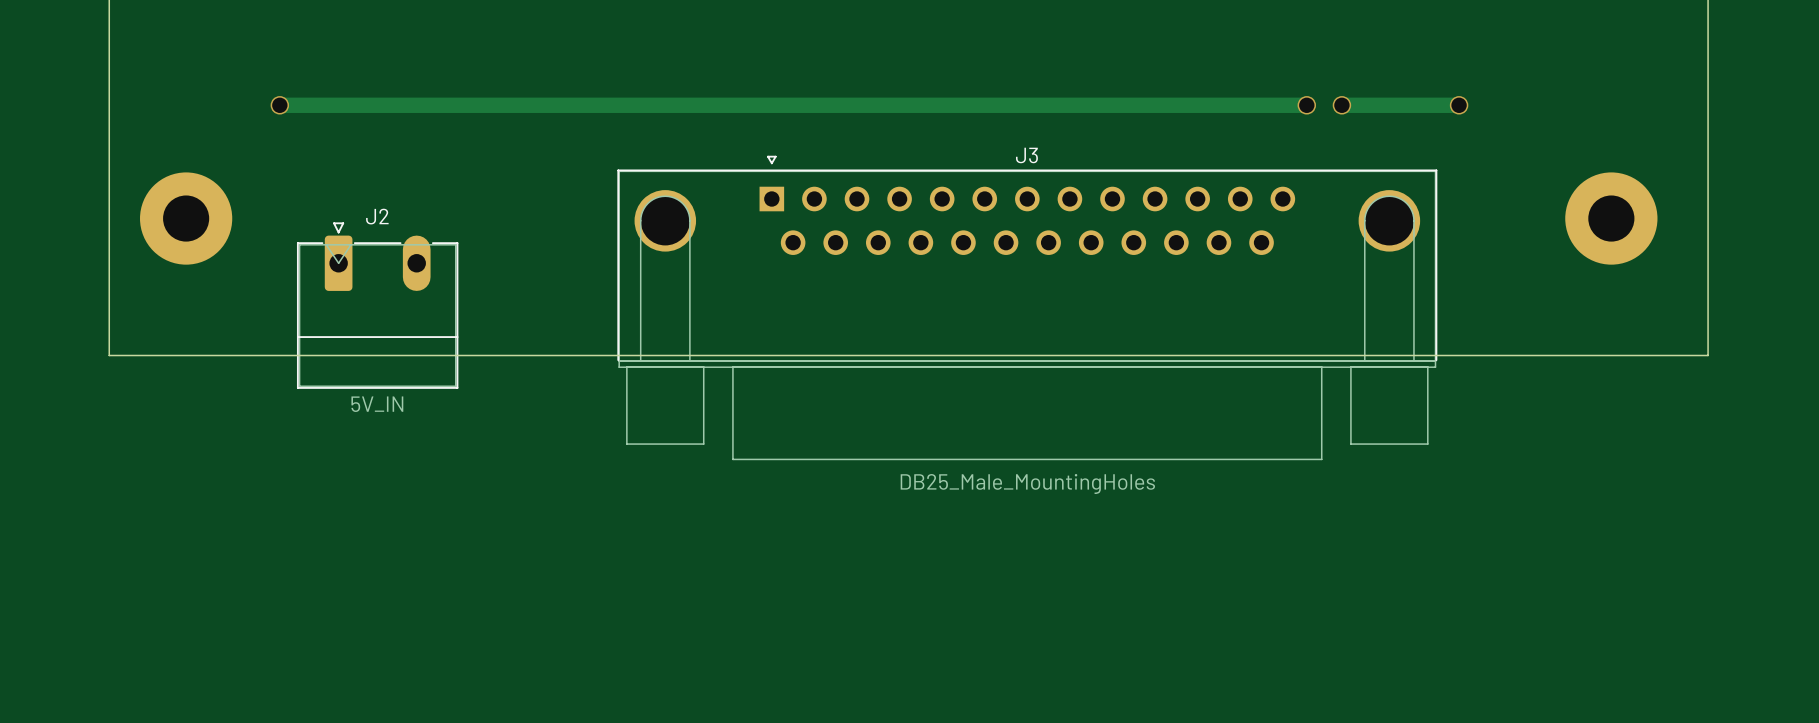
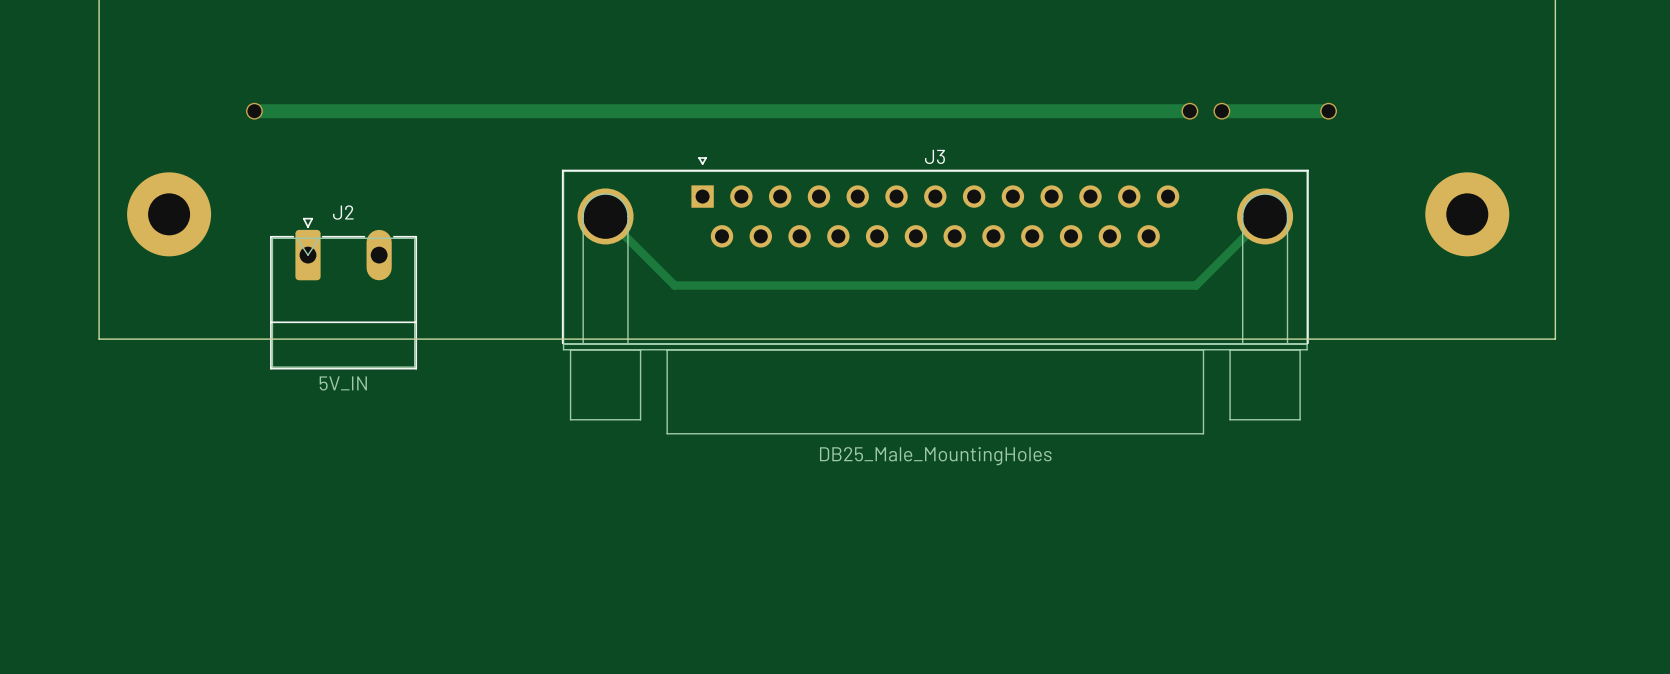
track: none -> (1265, 216) (1196, 285) (674, 285) (605, 216)

